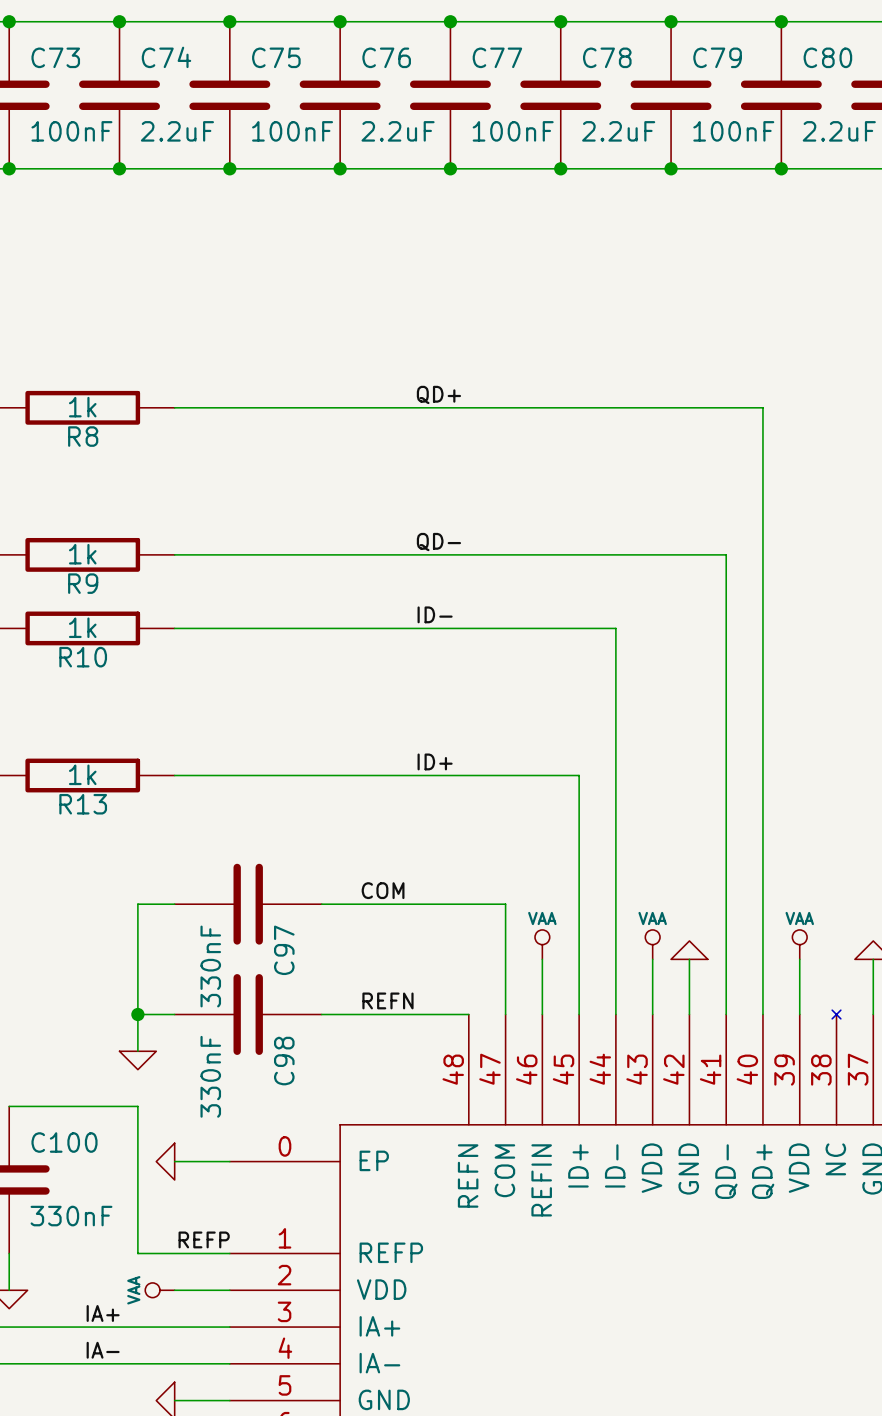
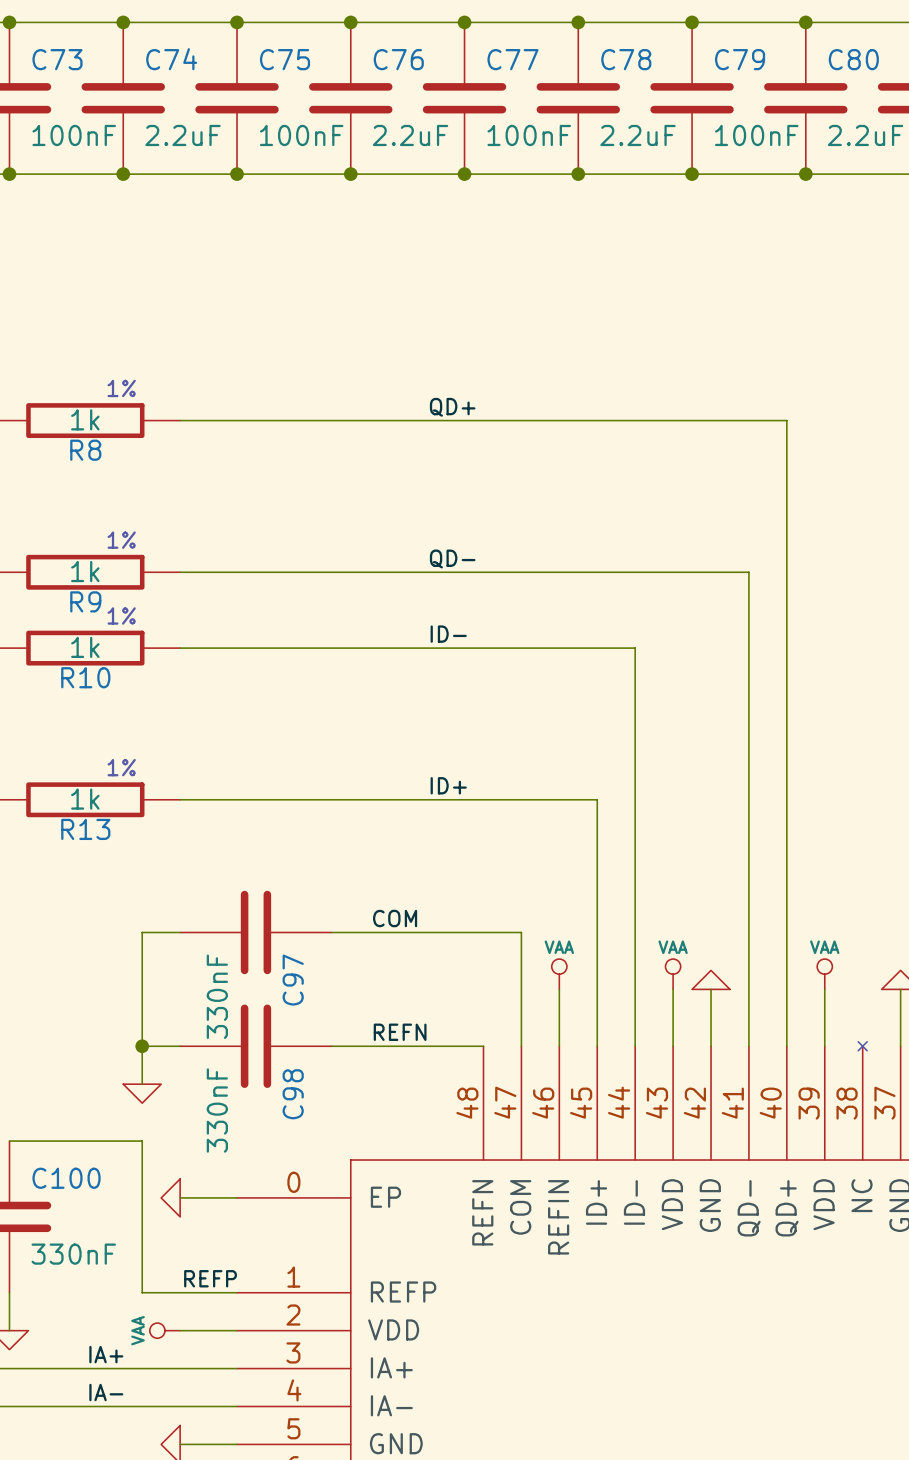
text: none -> 1% (121, 388)
text: none -> 1% (121, 540)
text: none -> 1% (121, 615)
text: none -> 1% (121, 767)

